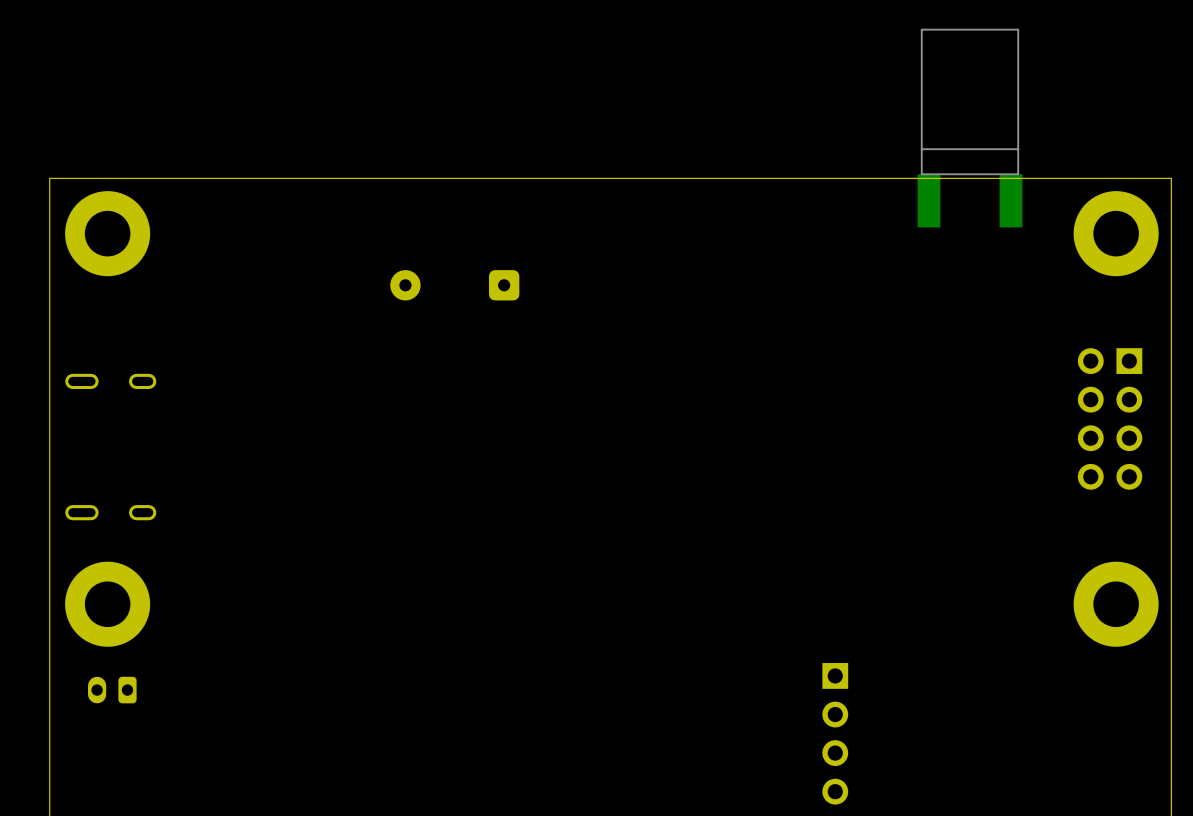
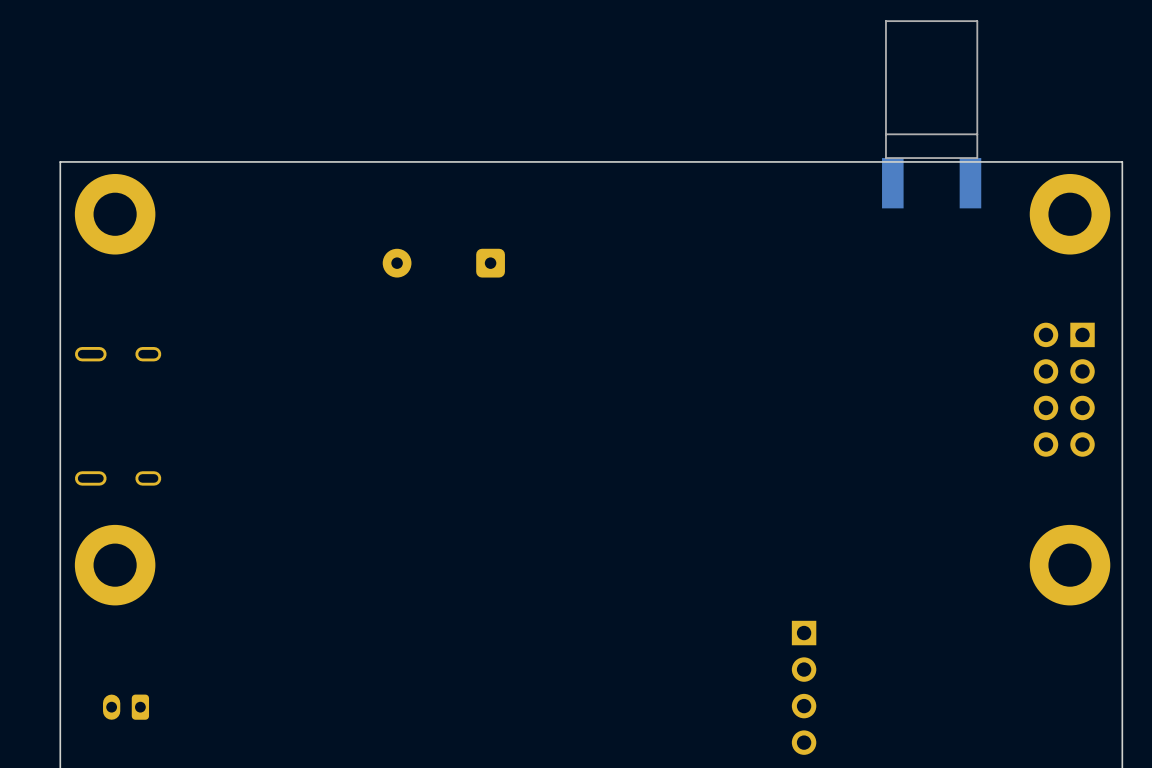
part position: (112, 690) -> (126, 707)

